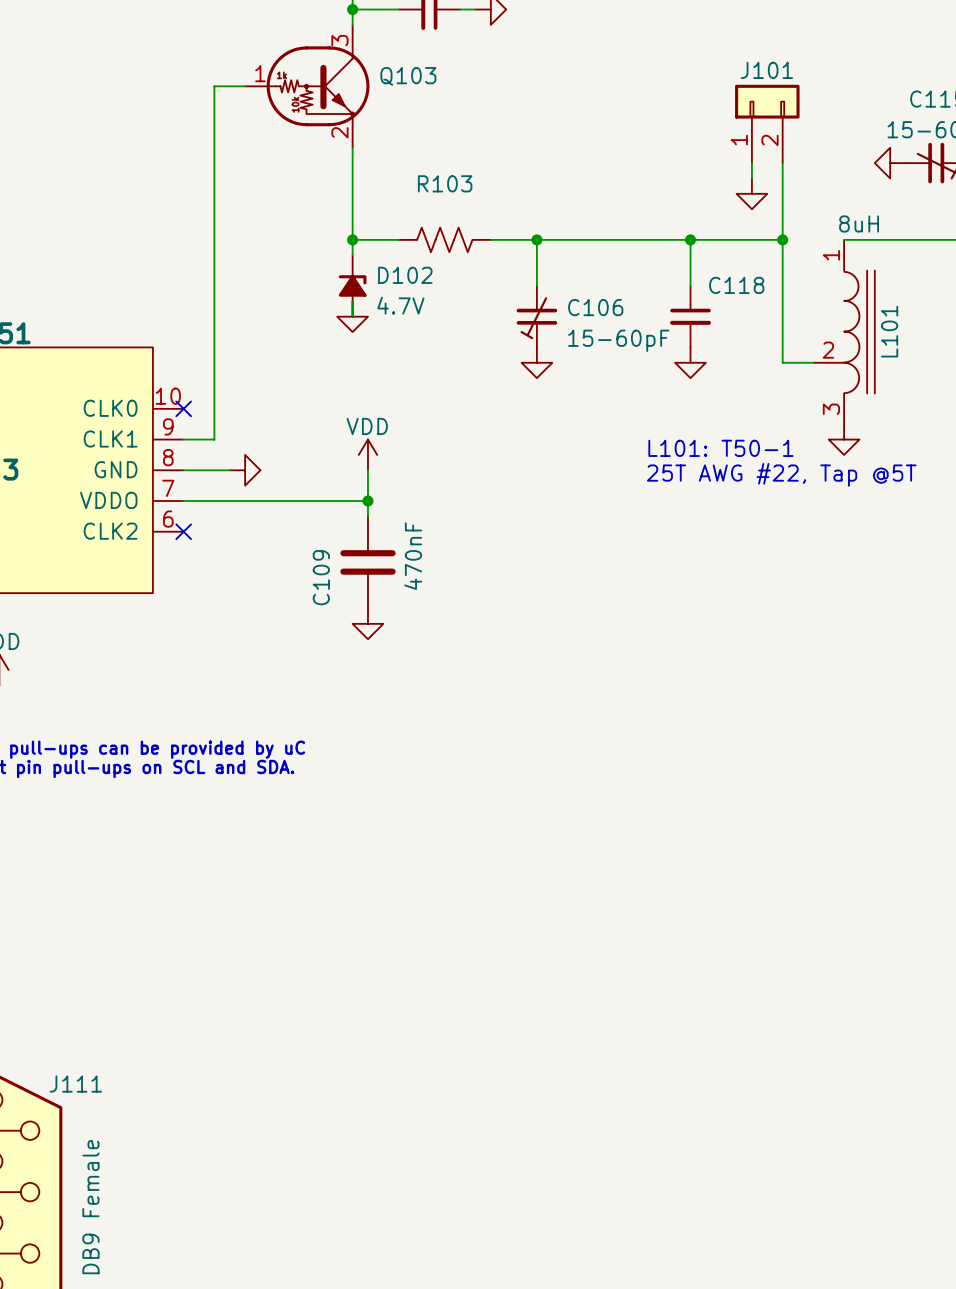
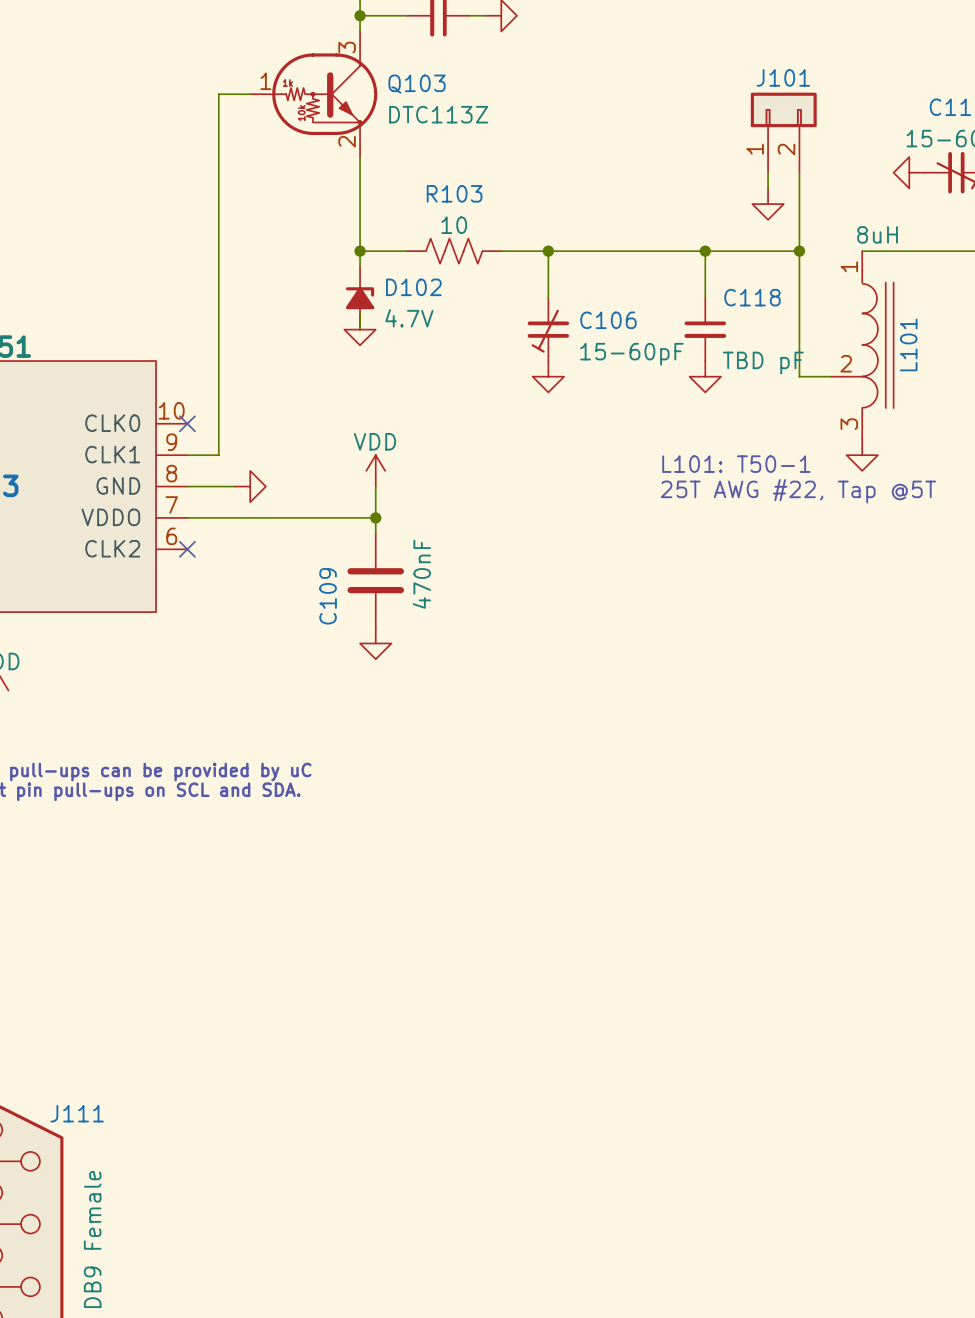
Q103 value: none -> DTC113Z (438, 114)
R103 value: none -> 10 (454, 225)
C118 value: none -> TBD pF (763, 363)

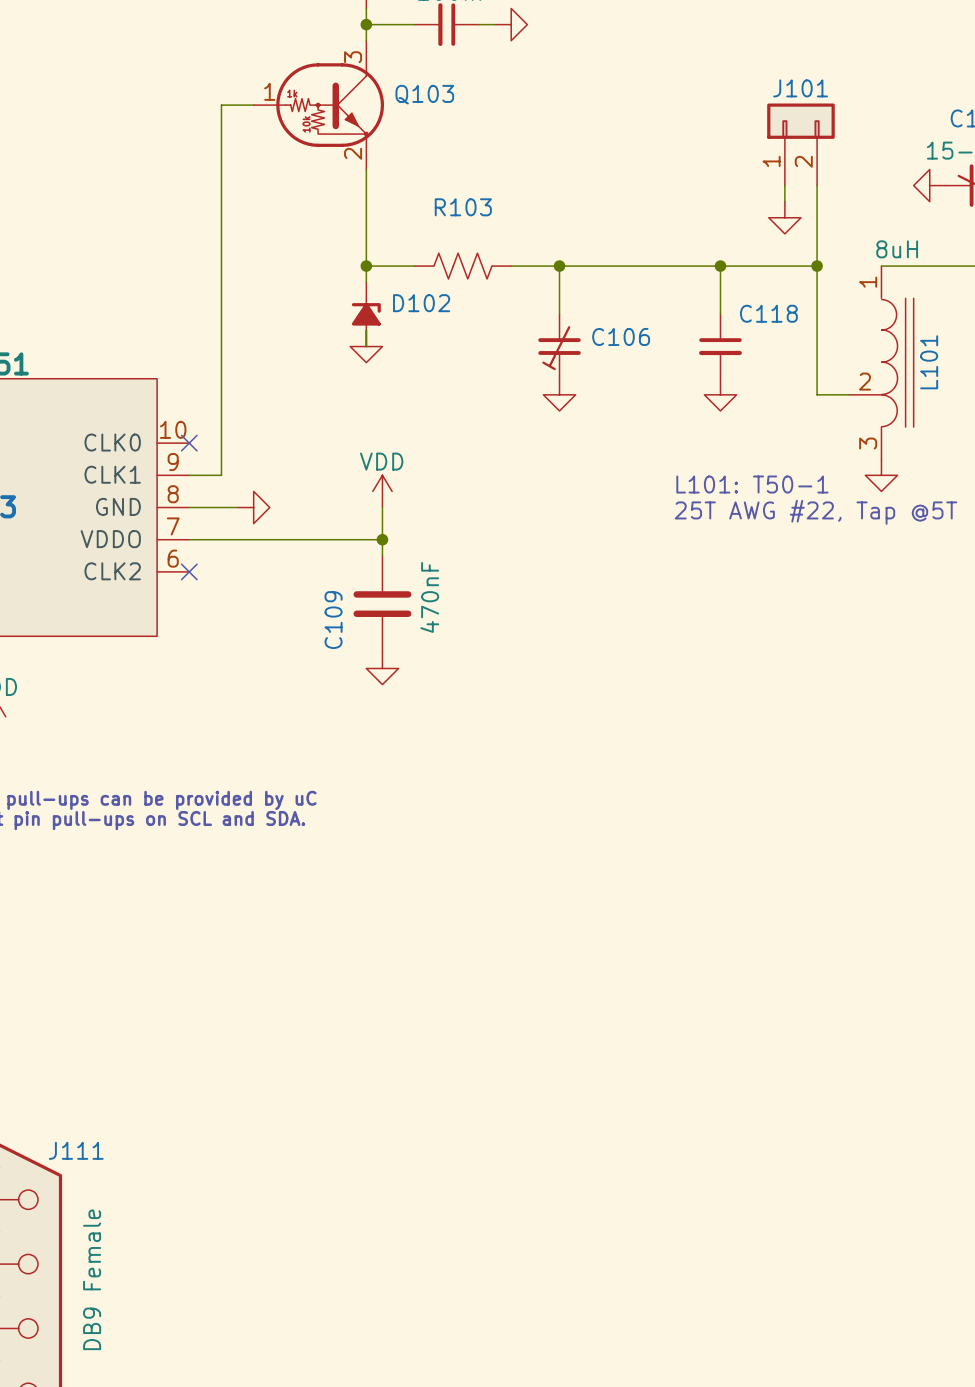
Q103 value: DTC113Z (438, 114) -> none
R103 value: 10 (454, 225) -> none
D102 value: 4.7V (409, 318) -> none
C106 value: 15-60pF (631, 354) -> none
C118 value: TBD pF (763, 363) -> none

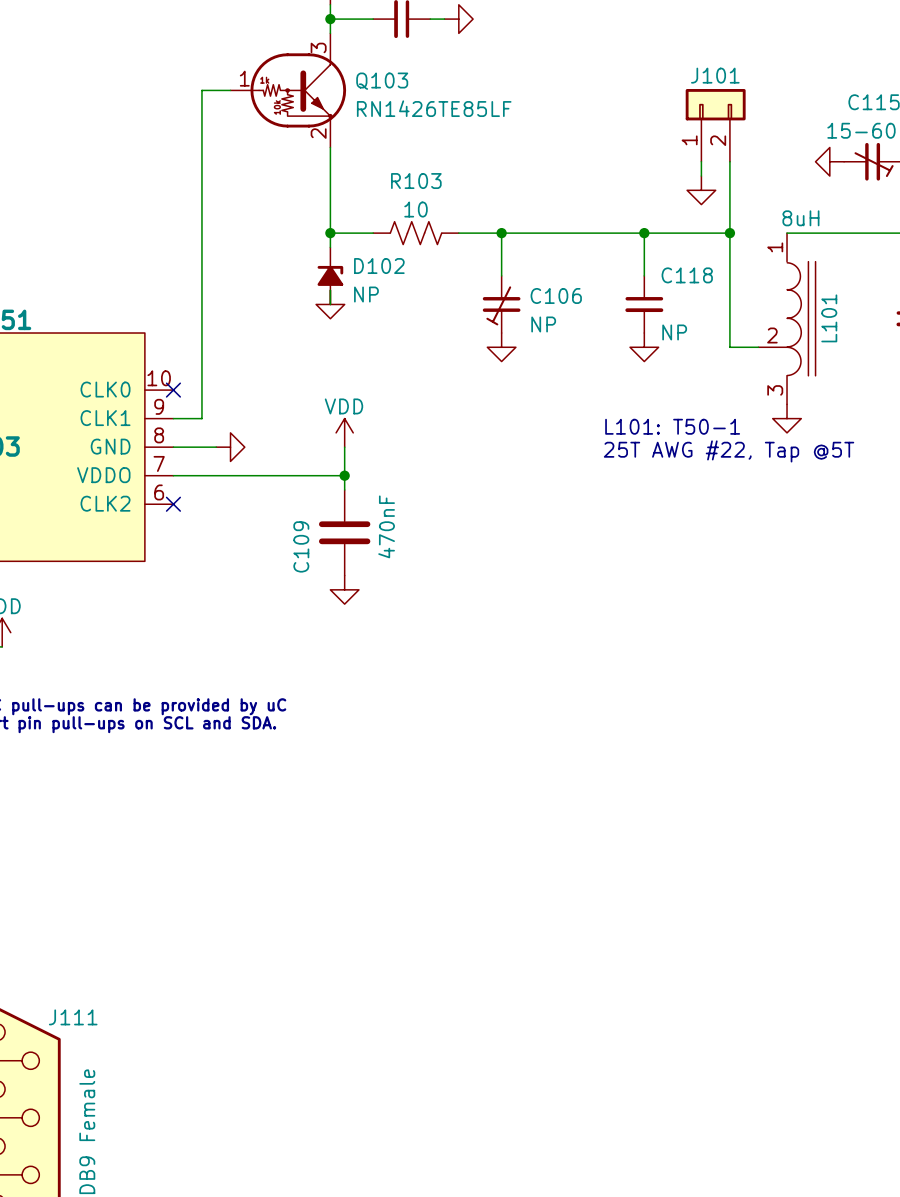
Q103 value: none -> RN1426TE85LF (434, 108)
R103 value: none -> 10 (416, 209)
D102 value: none -> NP (366, 294)
C106 value: none -> NP (543, 324)
C118 value: none -> NP (674, 332)

